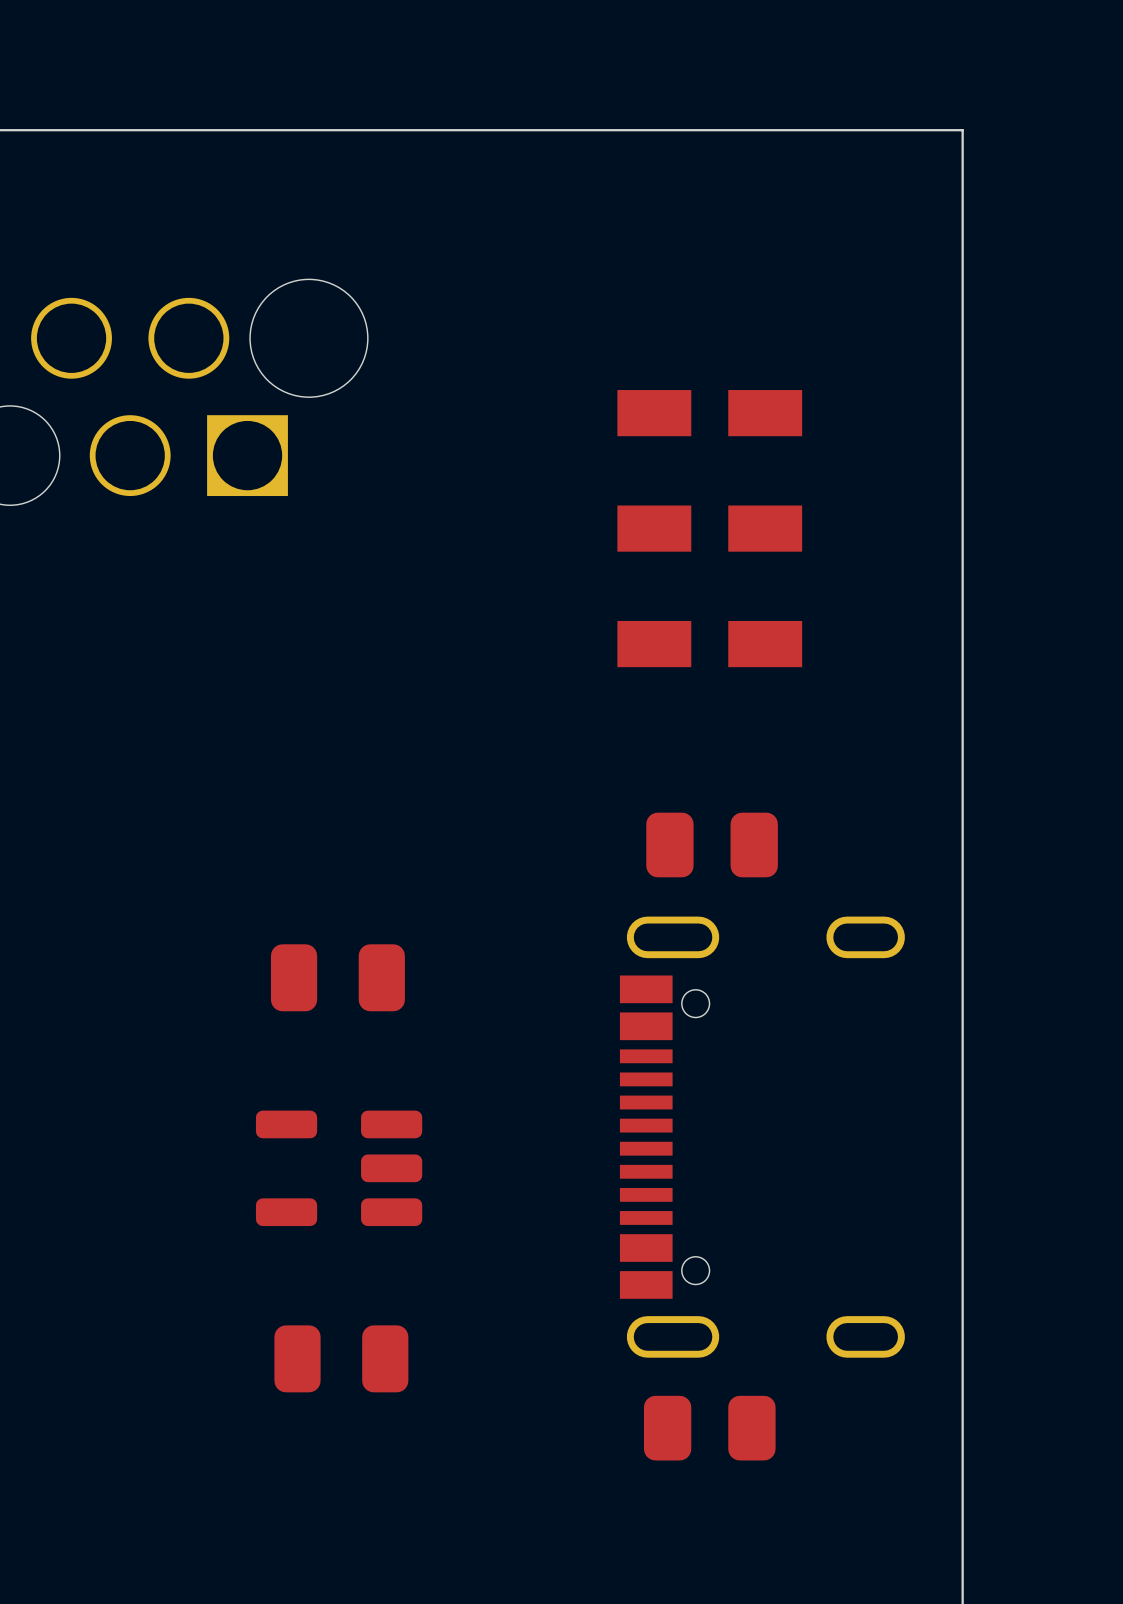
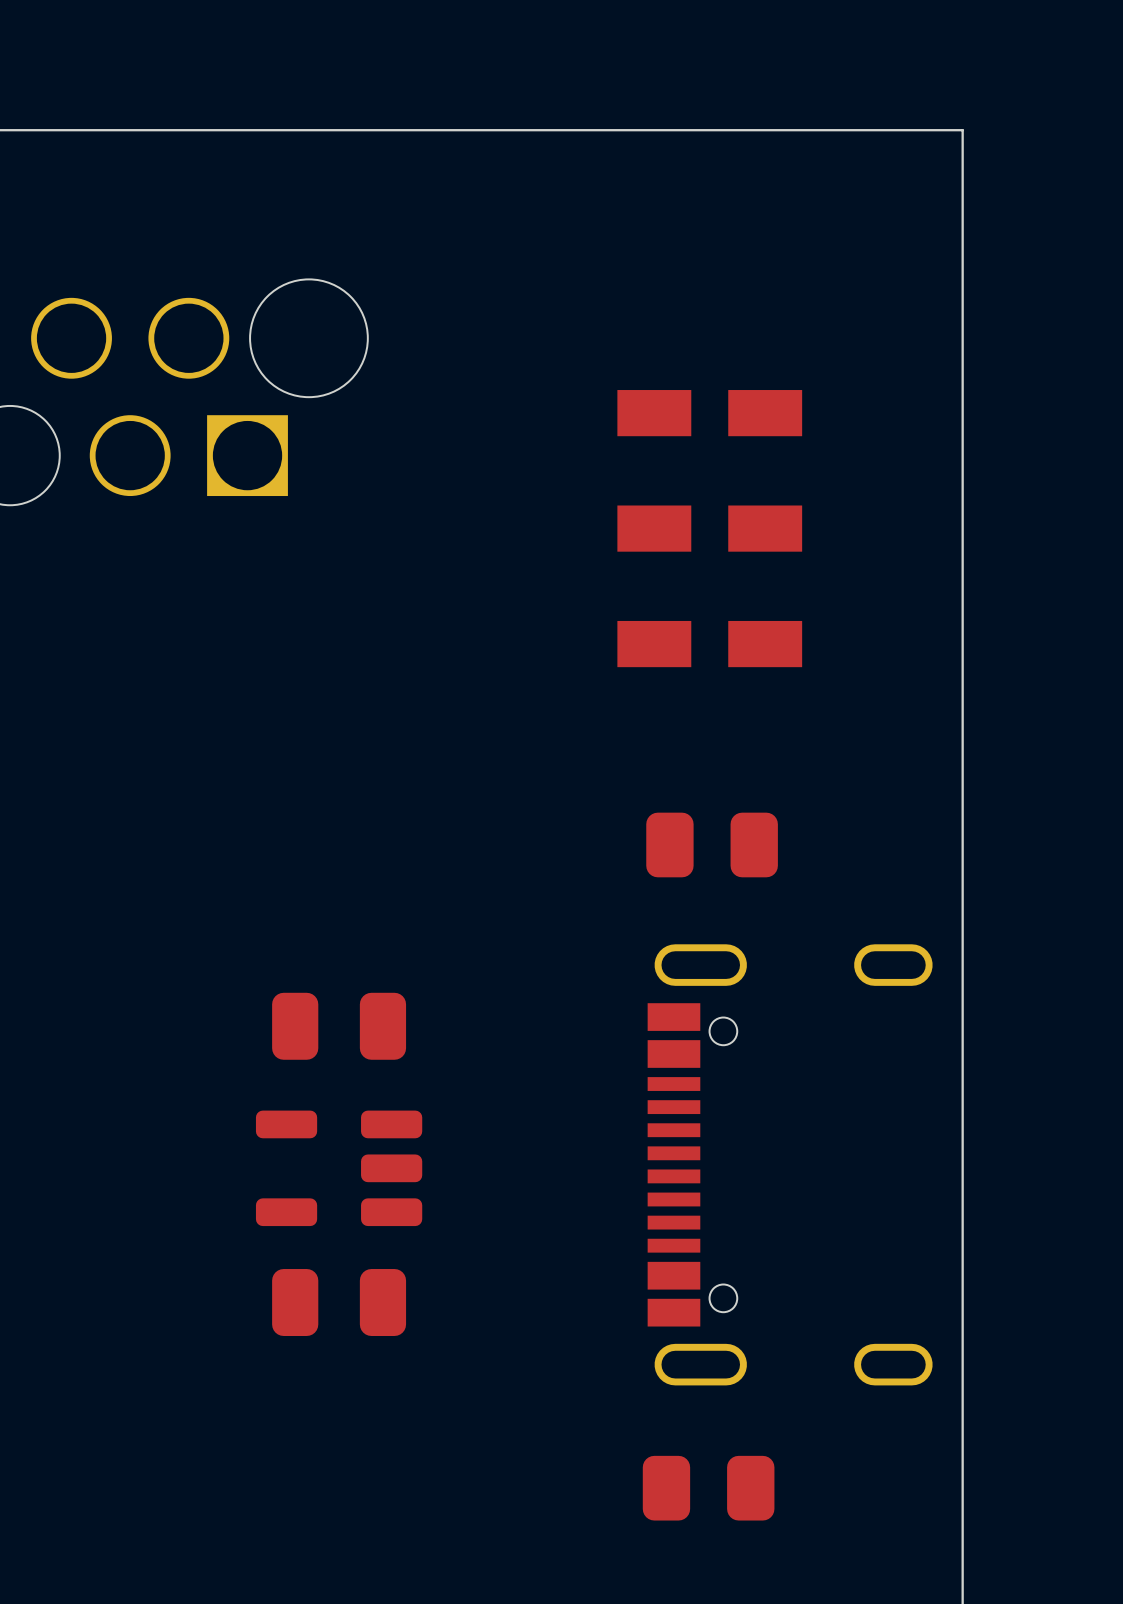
part position: (337, 977) -> (339, 1026)
part position: (762, 1137) -> (790, 1164)
part position: (341, 1358) -> (339, 1302)
part position: (709, 1428) -> (708, 1488)

